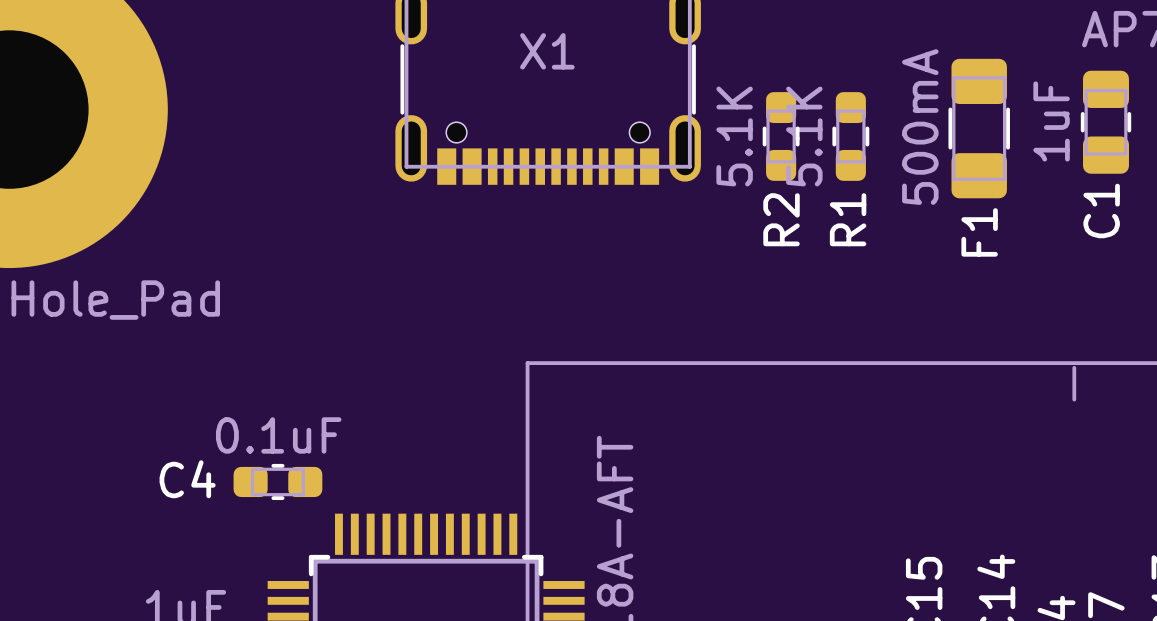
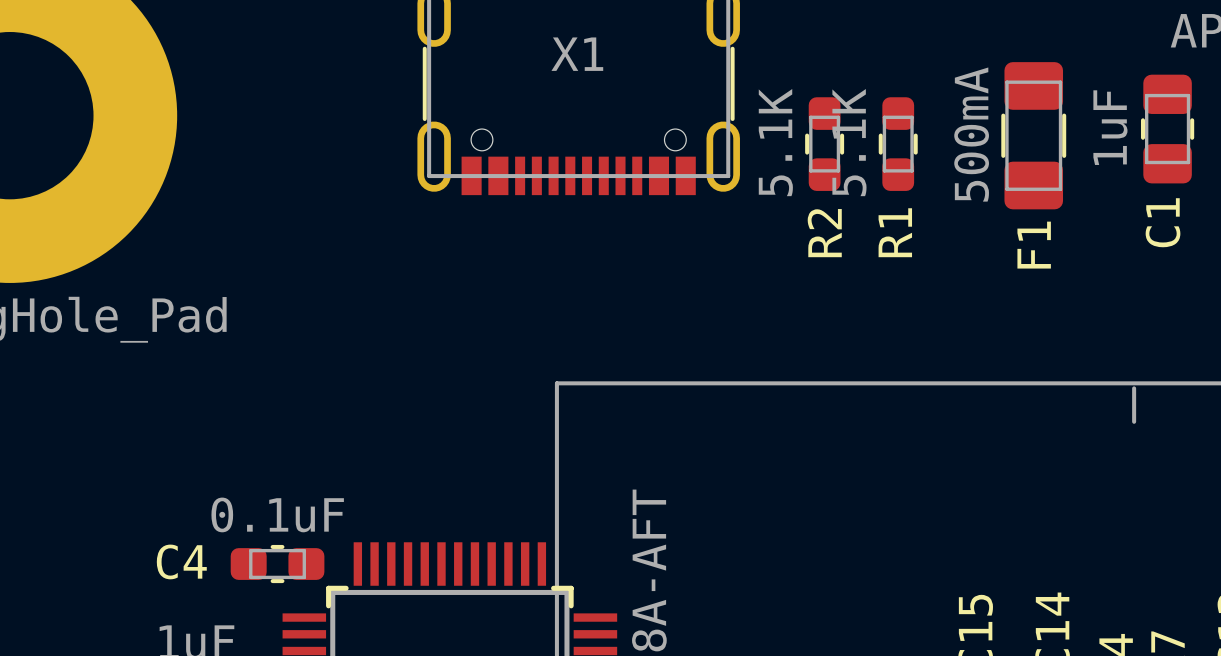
C4 position: (277, 481) -> (277, 564)

